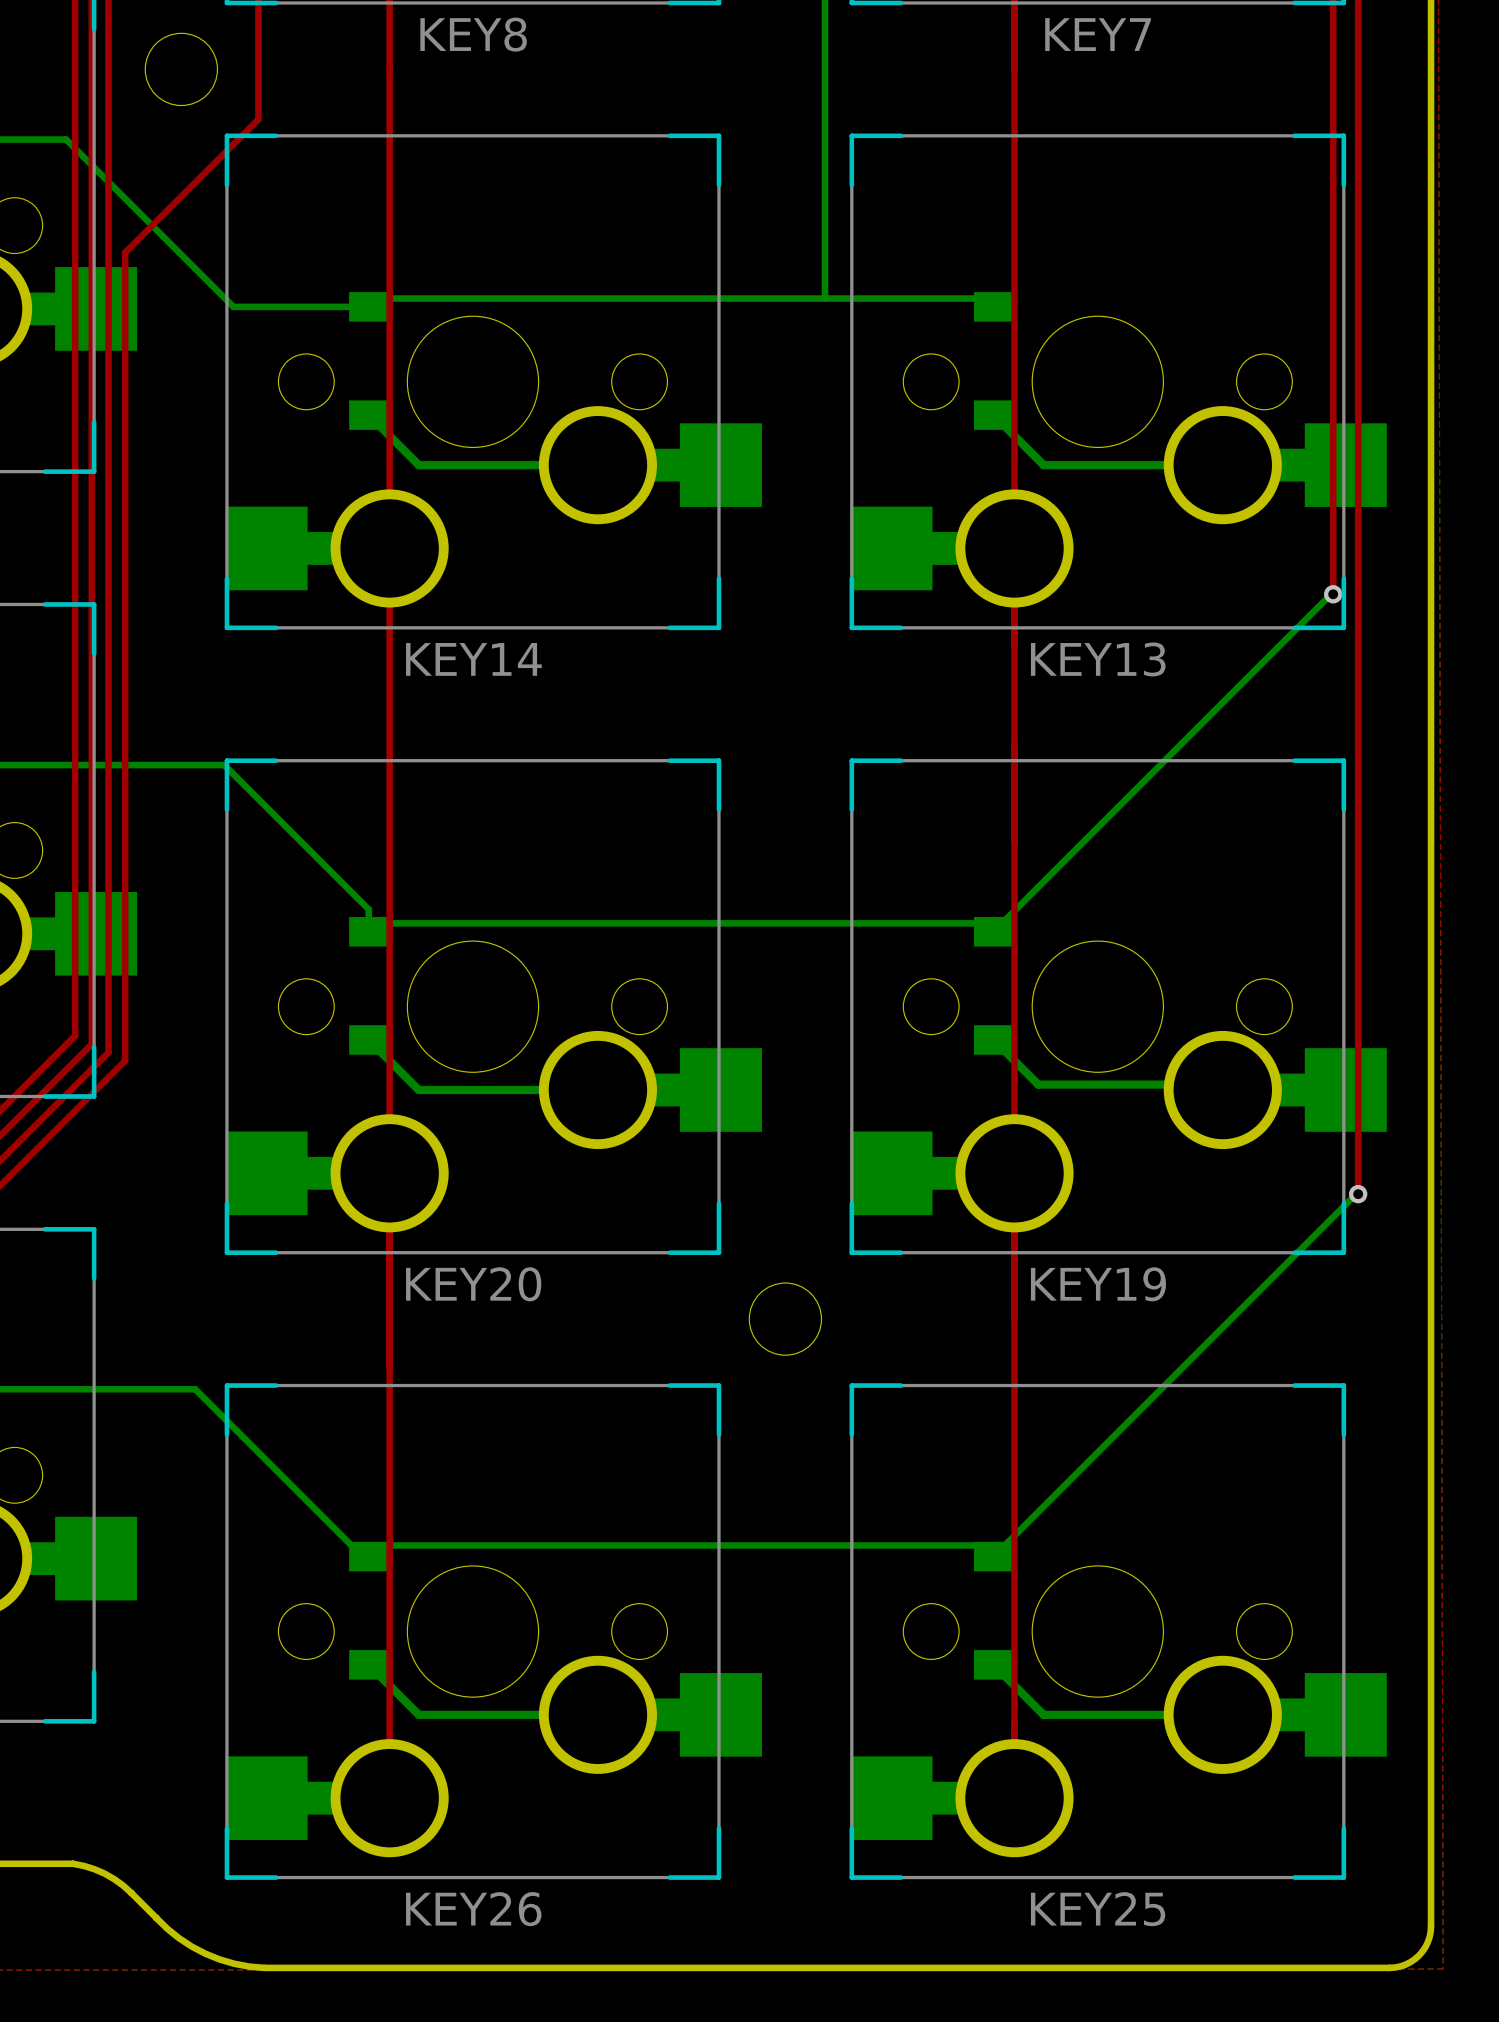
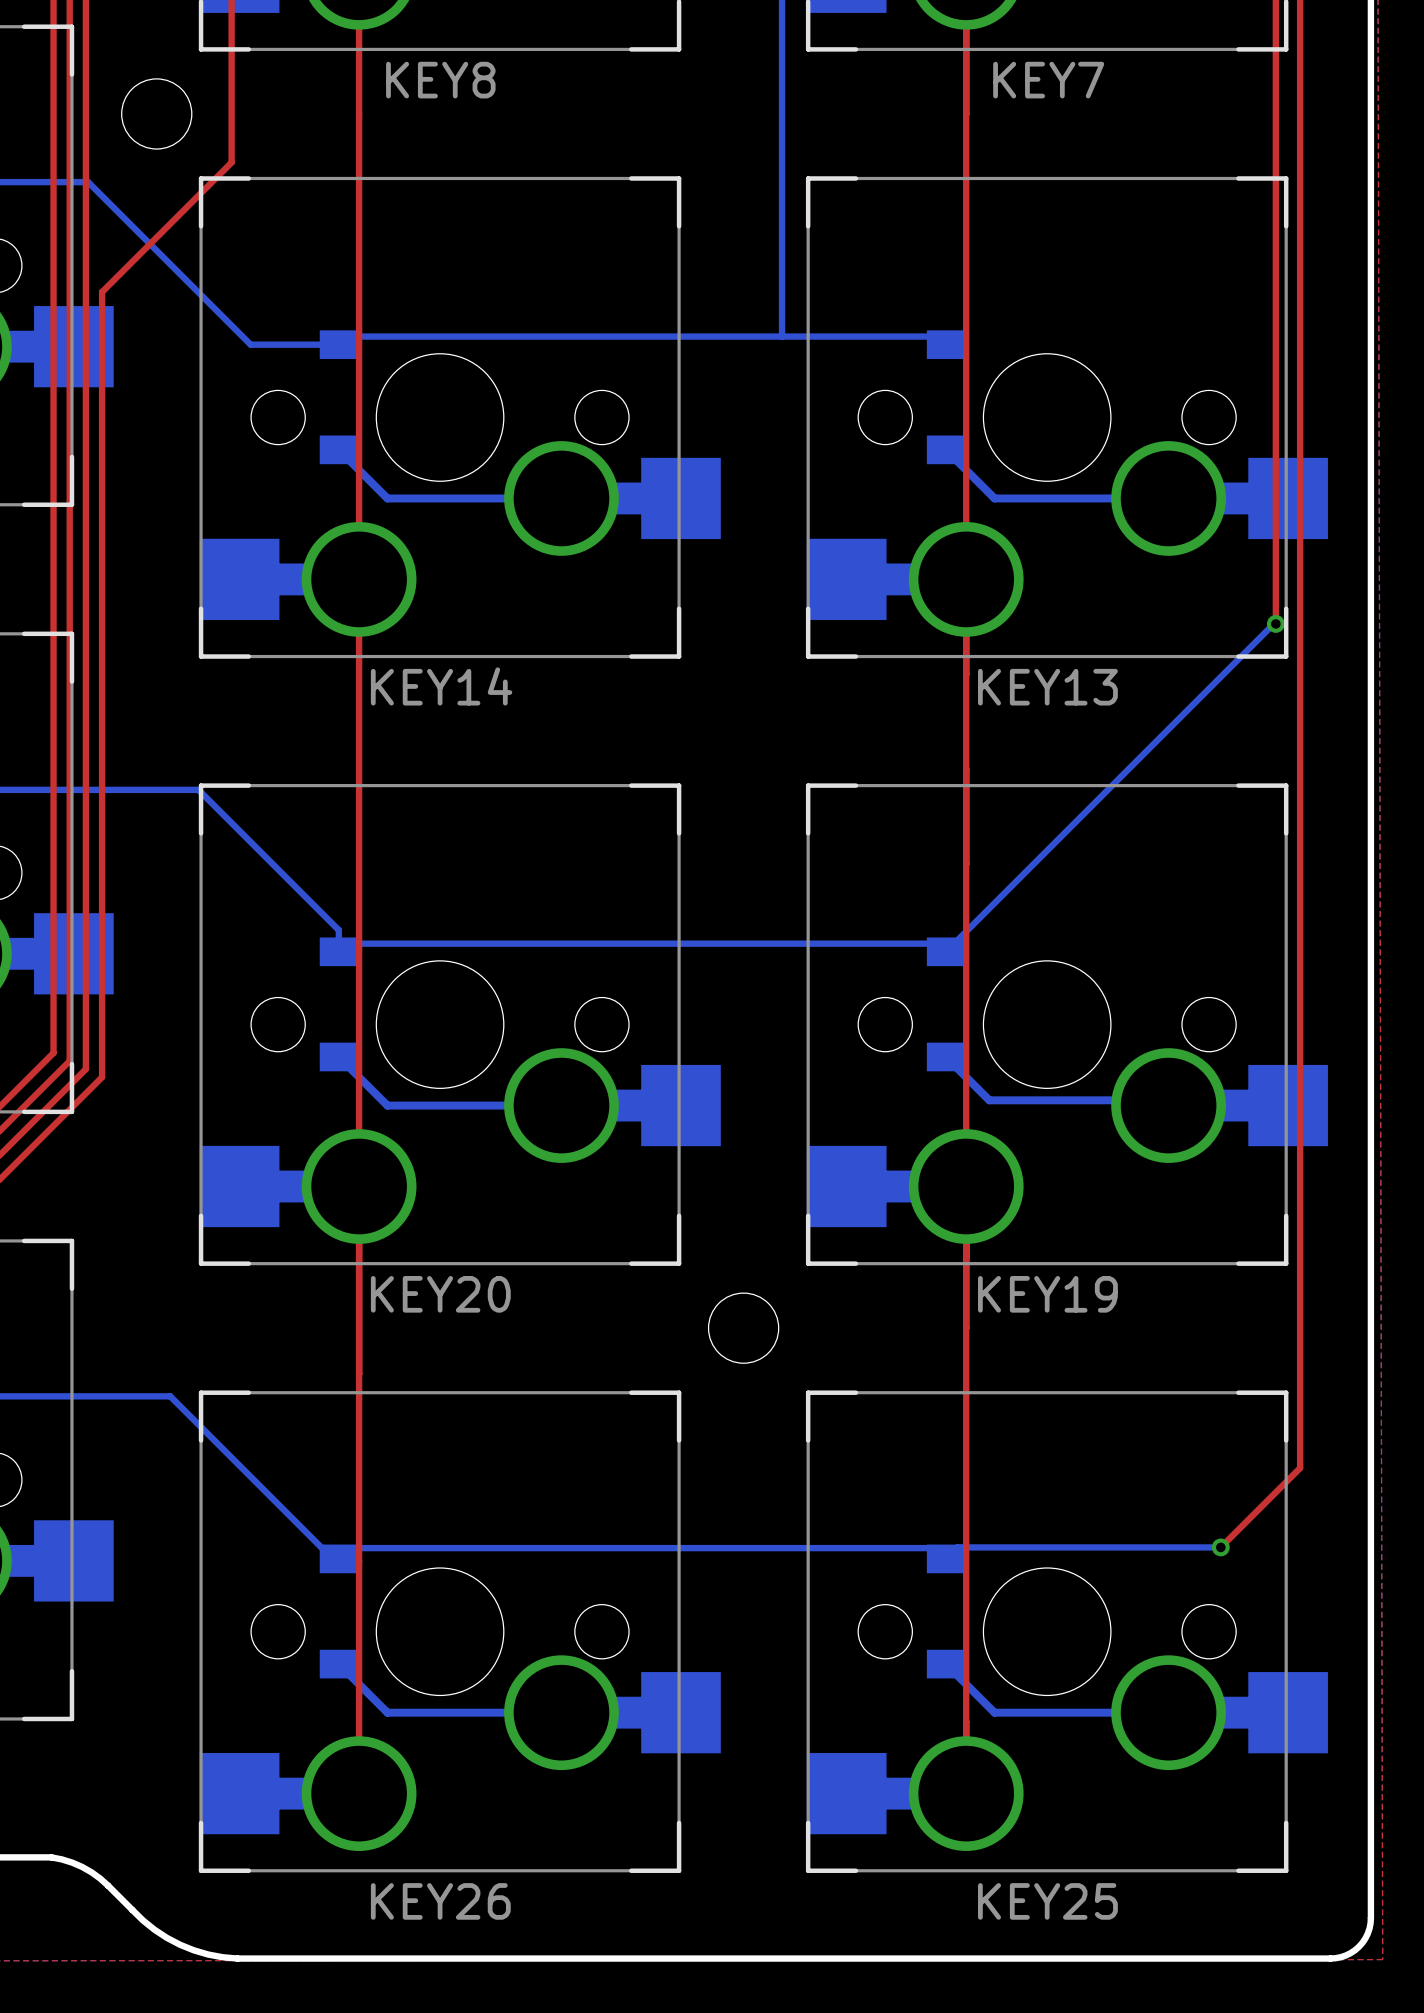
bottom track: (66, 139) (233, 306) (278, 306) -> (44, 182) (88, 182) (250, 344)
bottom track: (1358, 1194) (1005, 1544) -> (1220, 1547) (957, 1547)
top track: none -> (1300, 1206) (1300, 1468) (1220, 1547)
via: (1358, 1194) -> none
via: none -> (1220, 1547)

